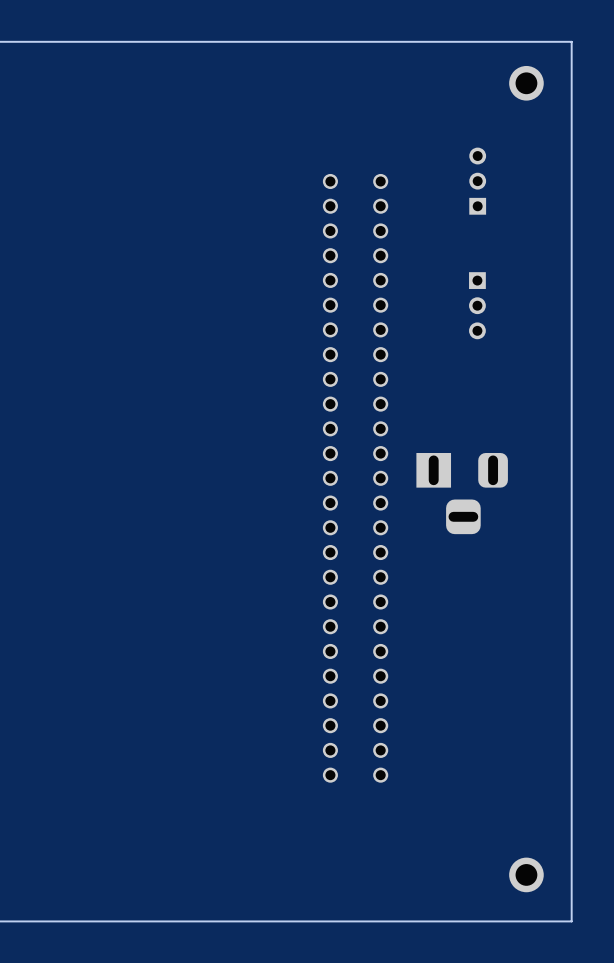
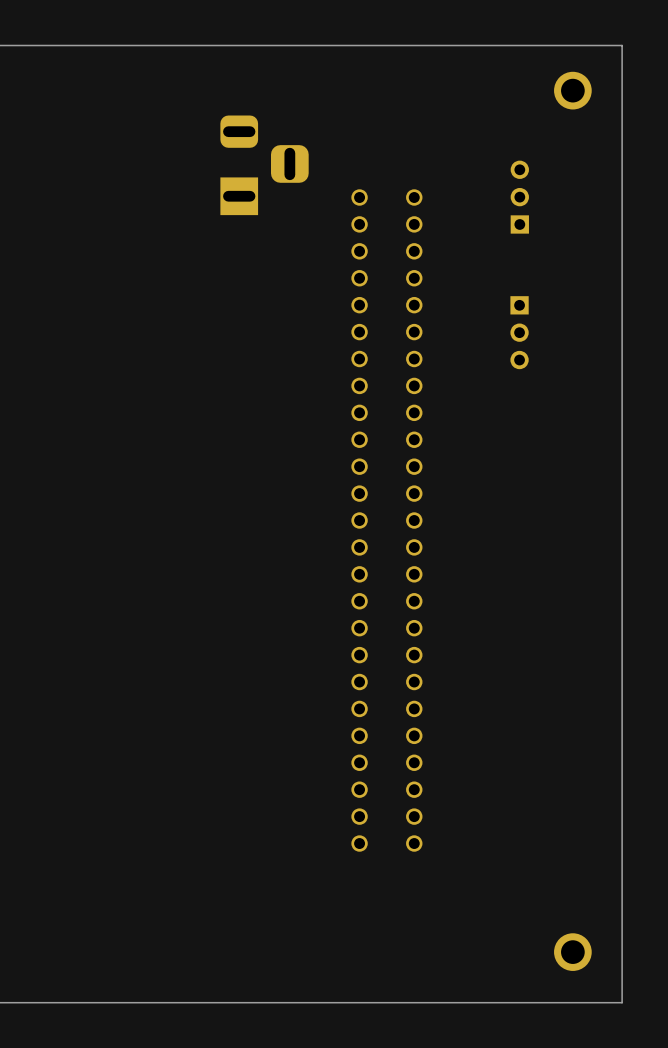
part: none -> (264, 165)
part: (462, 493) -> none

